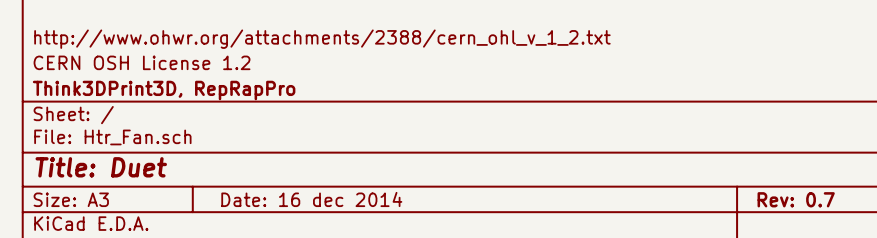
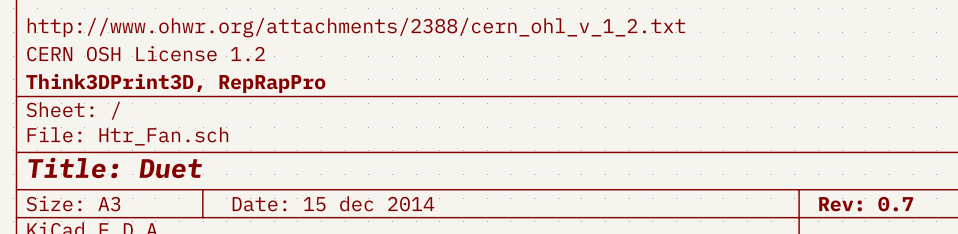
title block: Date: 16 dec 2014 (311, 199) -> Date: 15 dec 2014 (333, 203)

